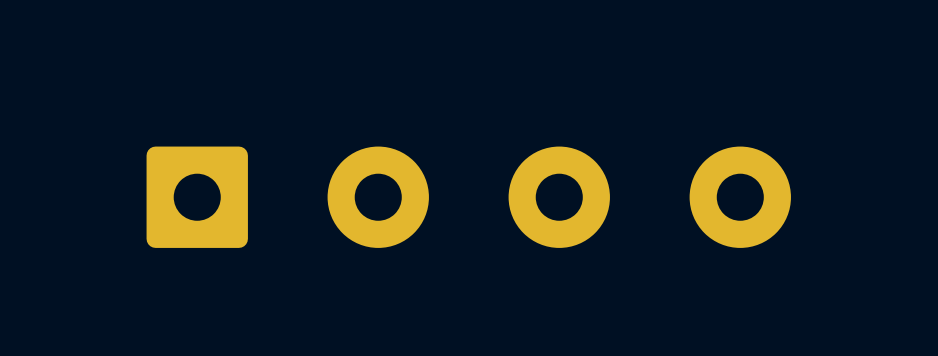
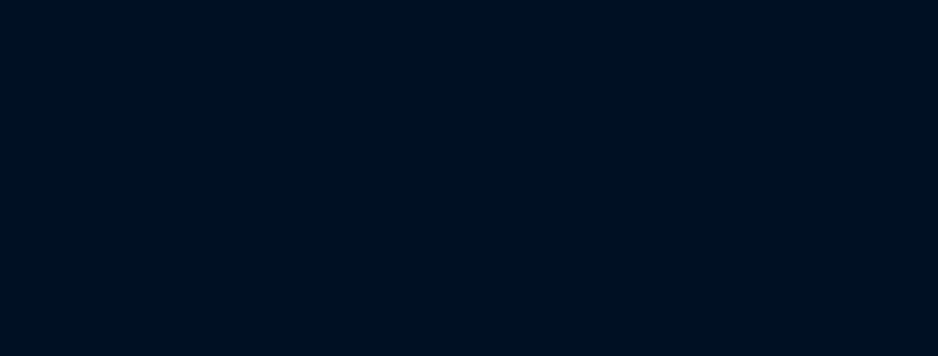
part: (468, 197) -> none

